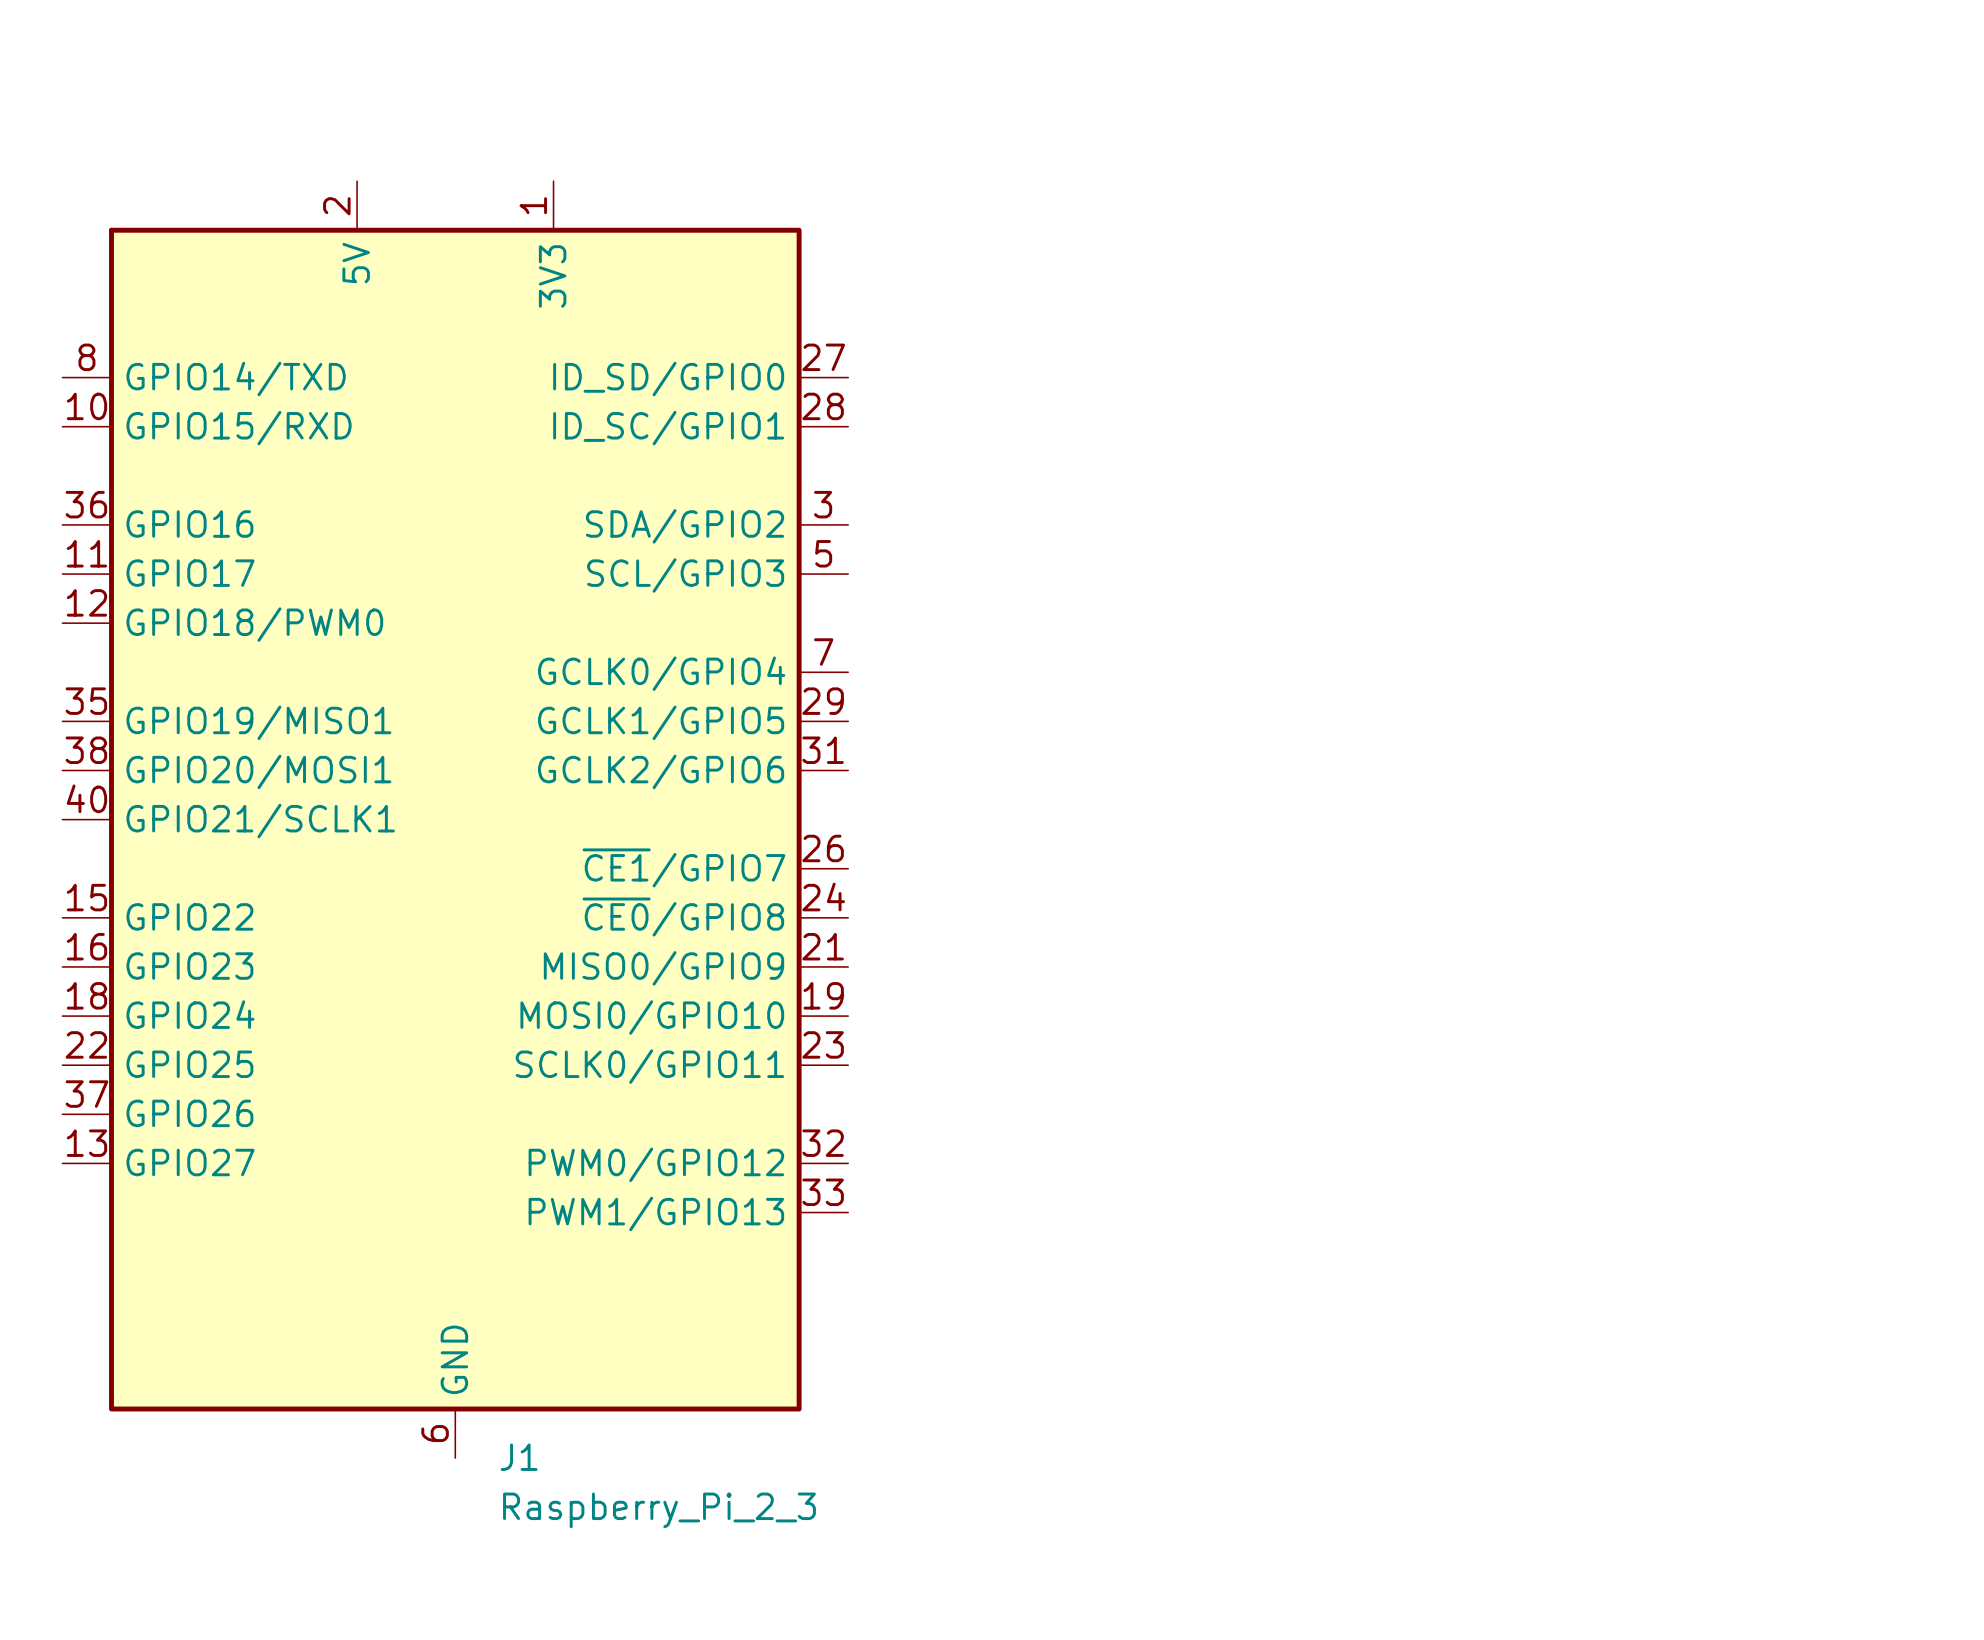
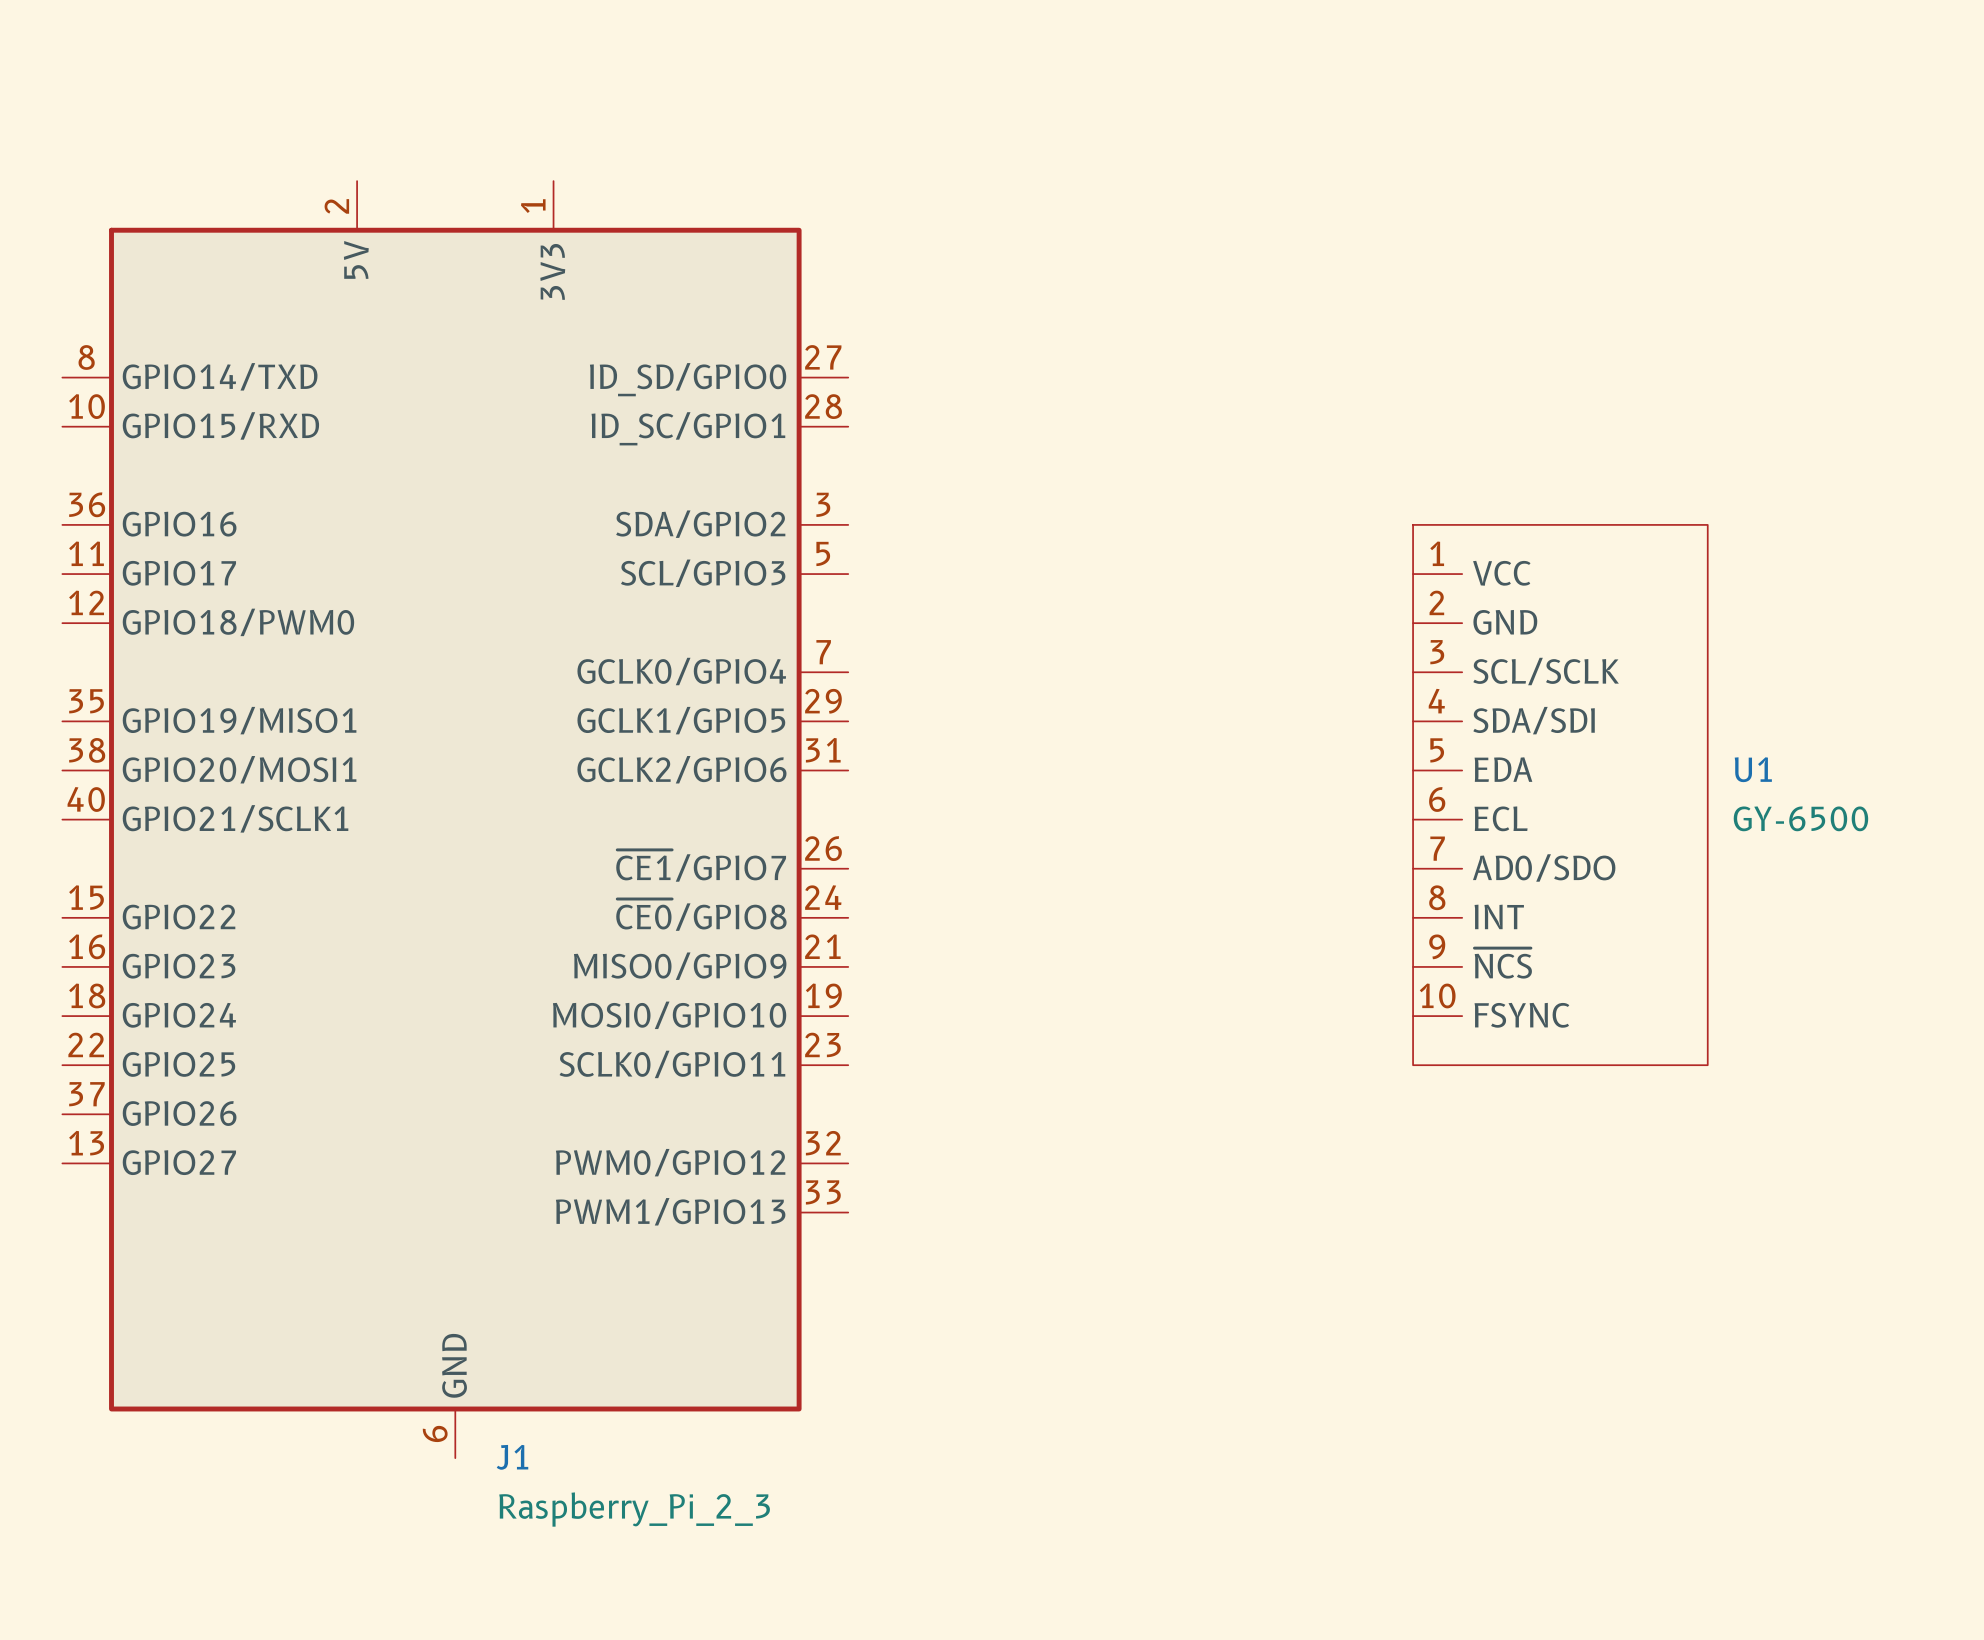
U1: none -> GY-6500 (1560, 795)

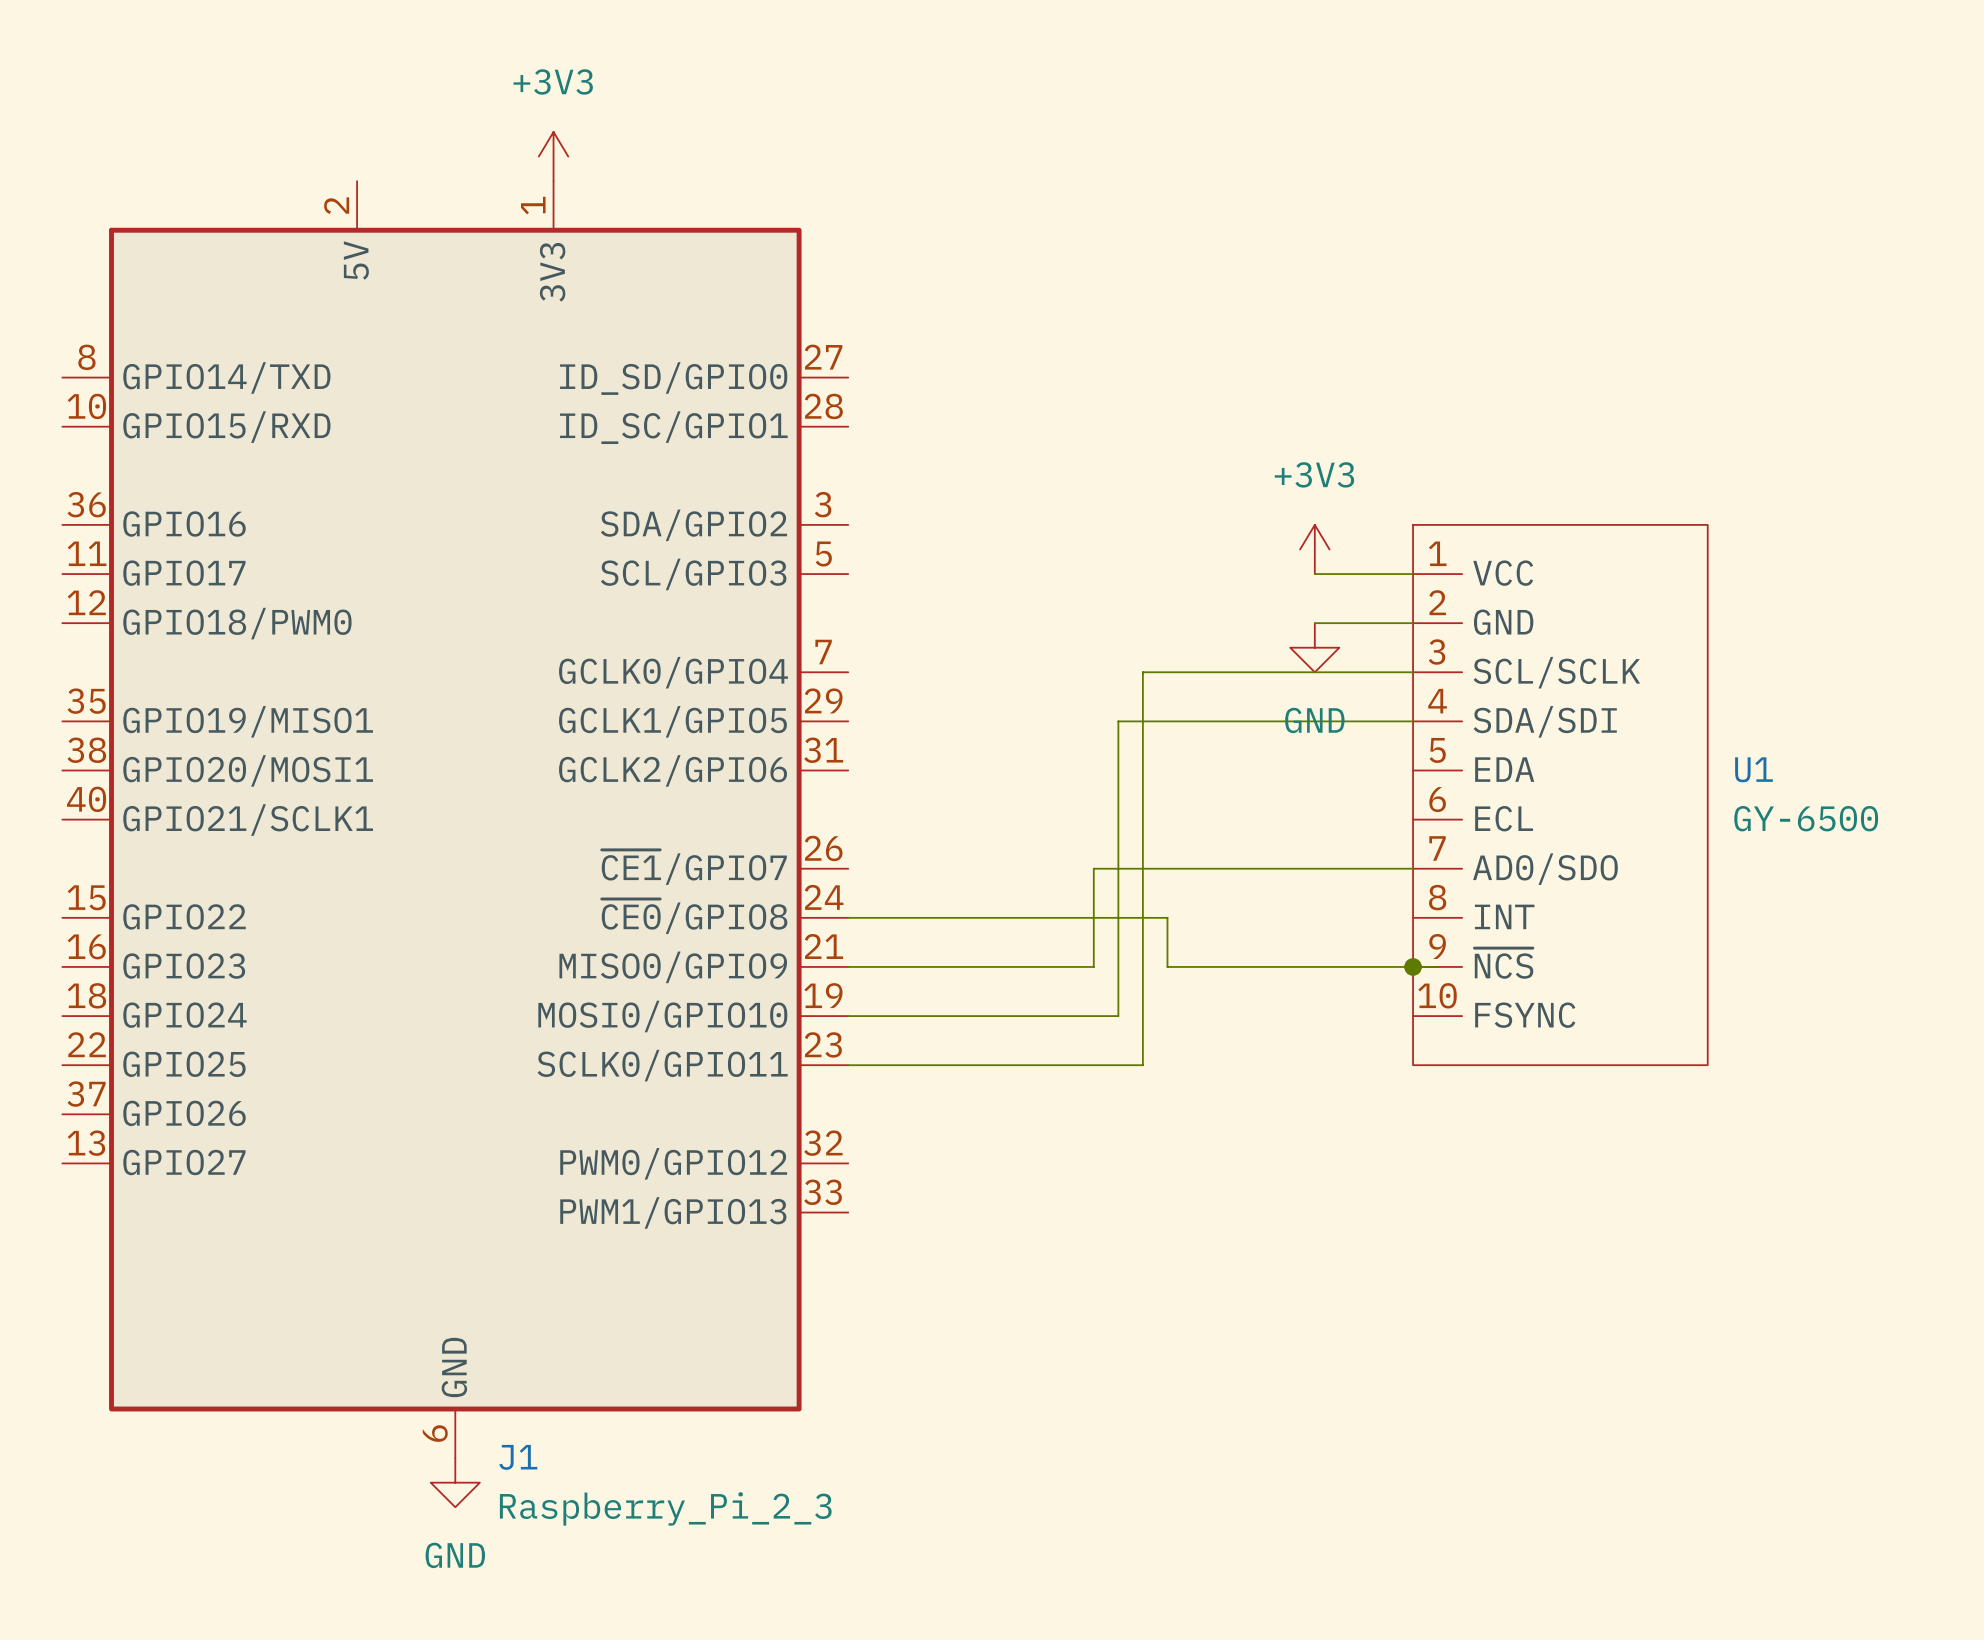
power symbol: none -> +3V3 (553, 156)
power symbol: none -> +3V3 (1314, 549)
wire: none -> (1314, 574) (1413, 574)
wire: none -> (1314, 623) (1413, 623)
power symbol: none -> GND (1314, 647)
wire: none -> (1413, 672) (1142, 672) (1142, 1065) (848, 1065)
wire: none -> (1413, 721) (1118, 721) (1118, 1016) (848, 1016)
wire: none -> (1413, 868) (1093, 868) (1093, 966) (848, 966)
wire: none -> (848, 917) (1167, 917) (1167, 966) (1437, 966)
junction: none -> (1413, 966)
power symbol: none -> GND (455, 1482)

